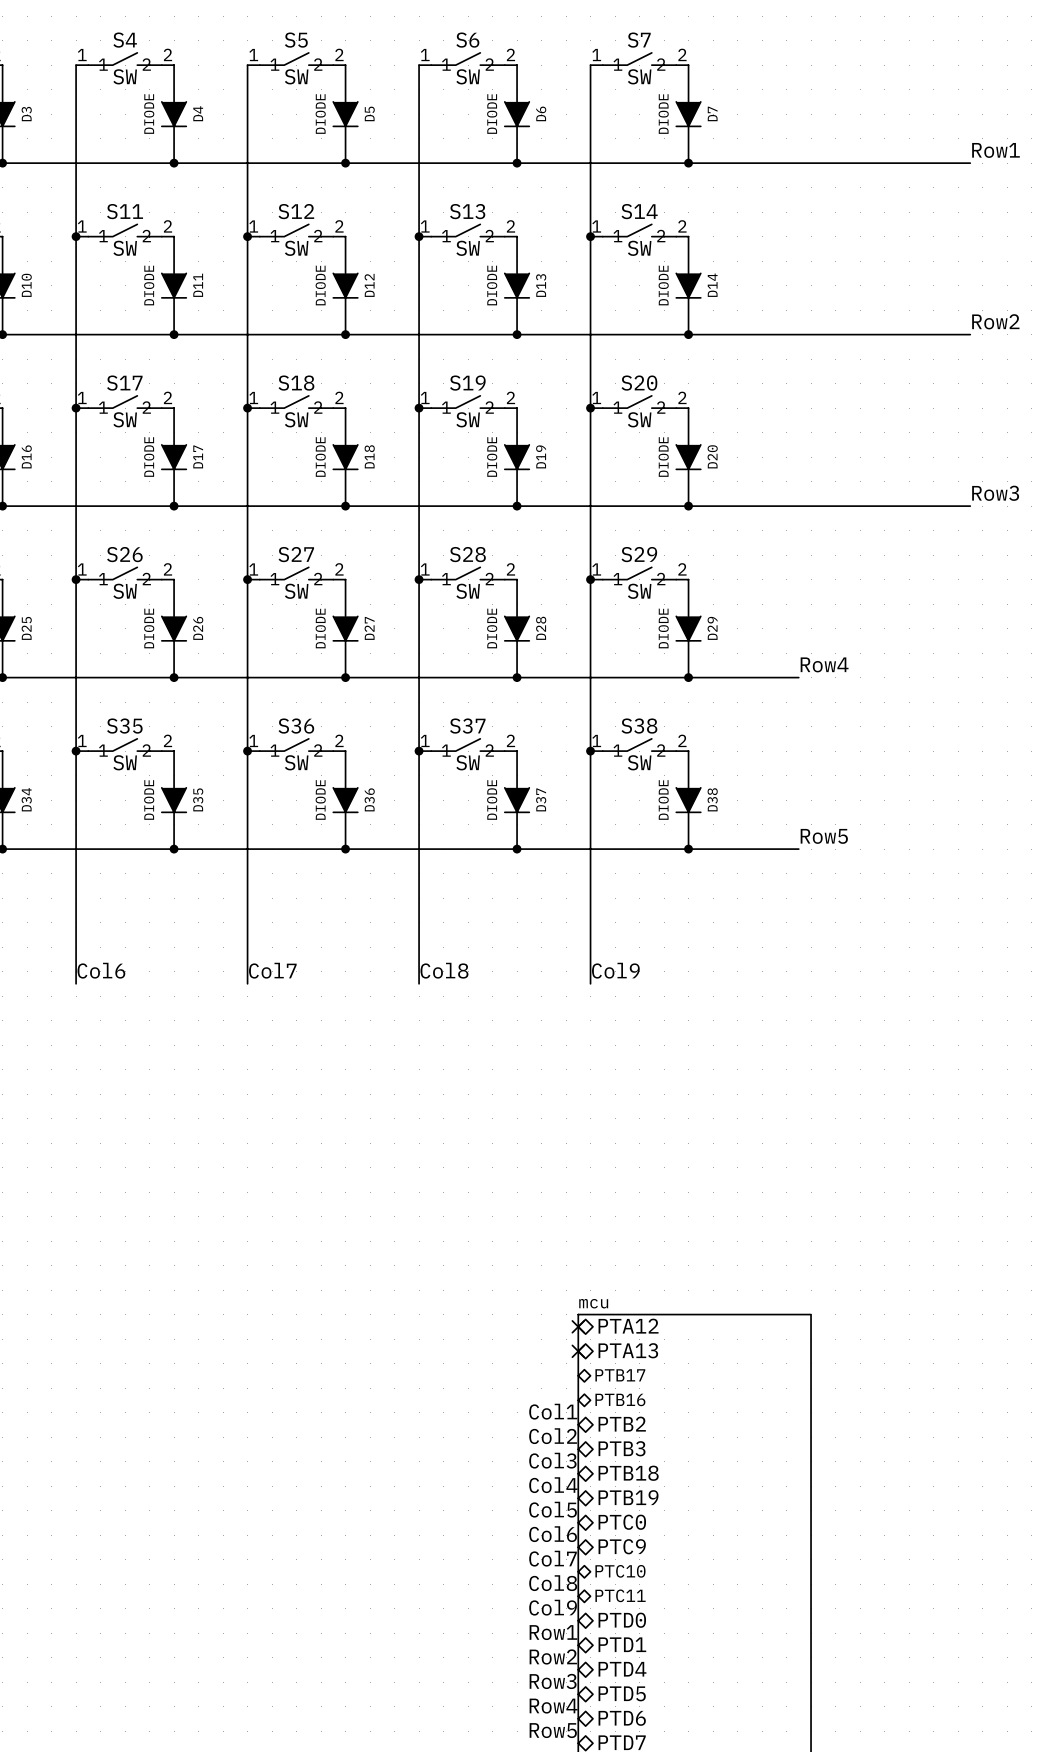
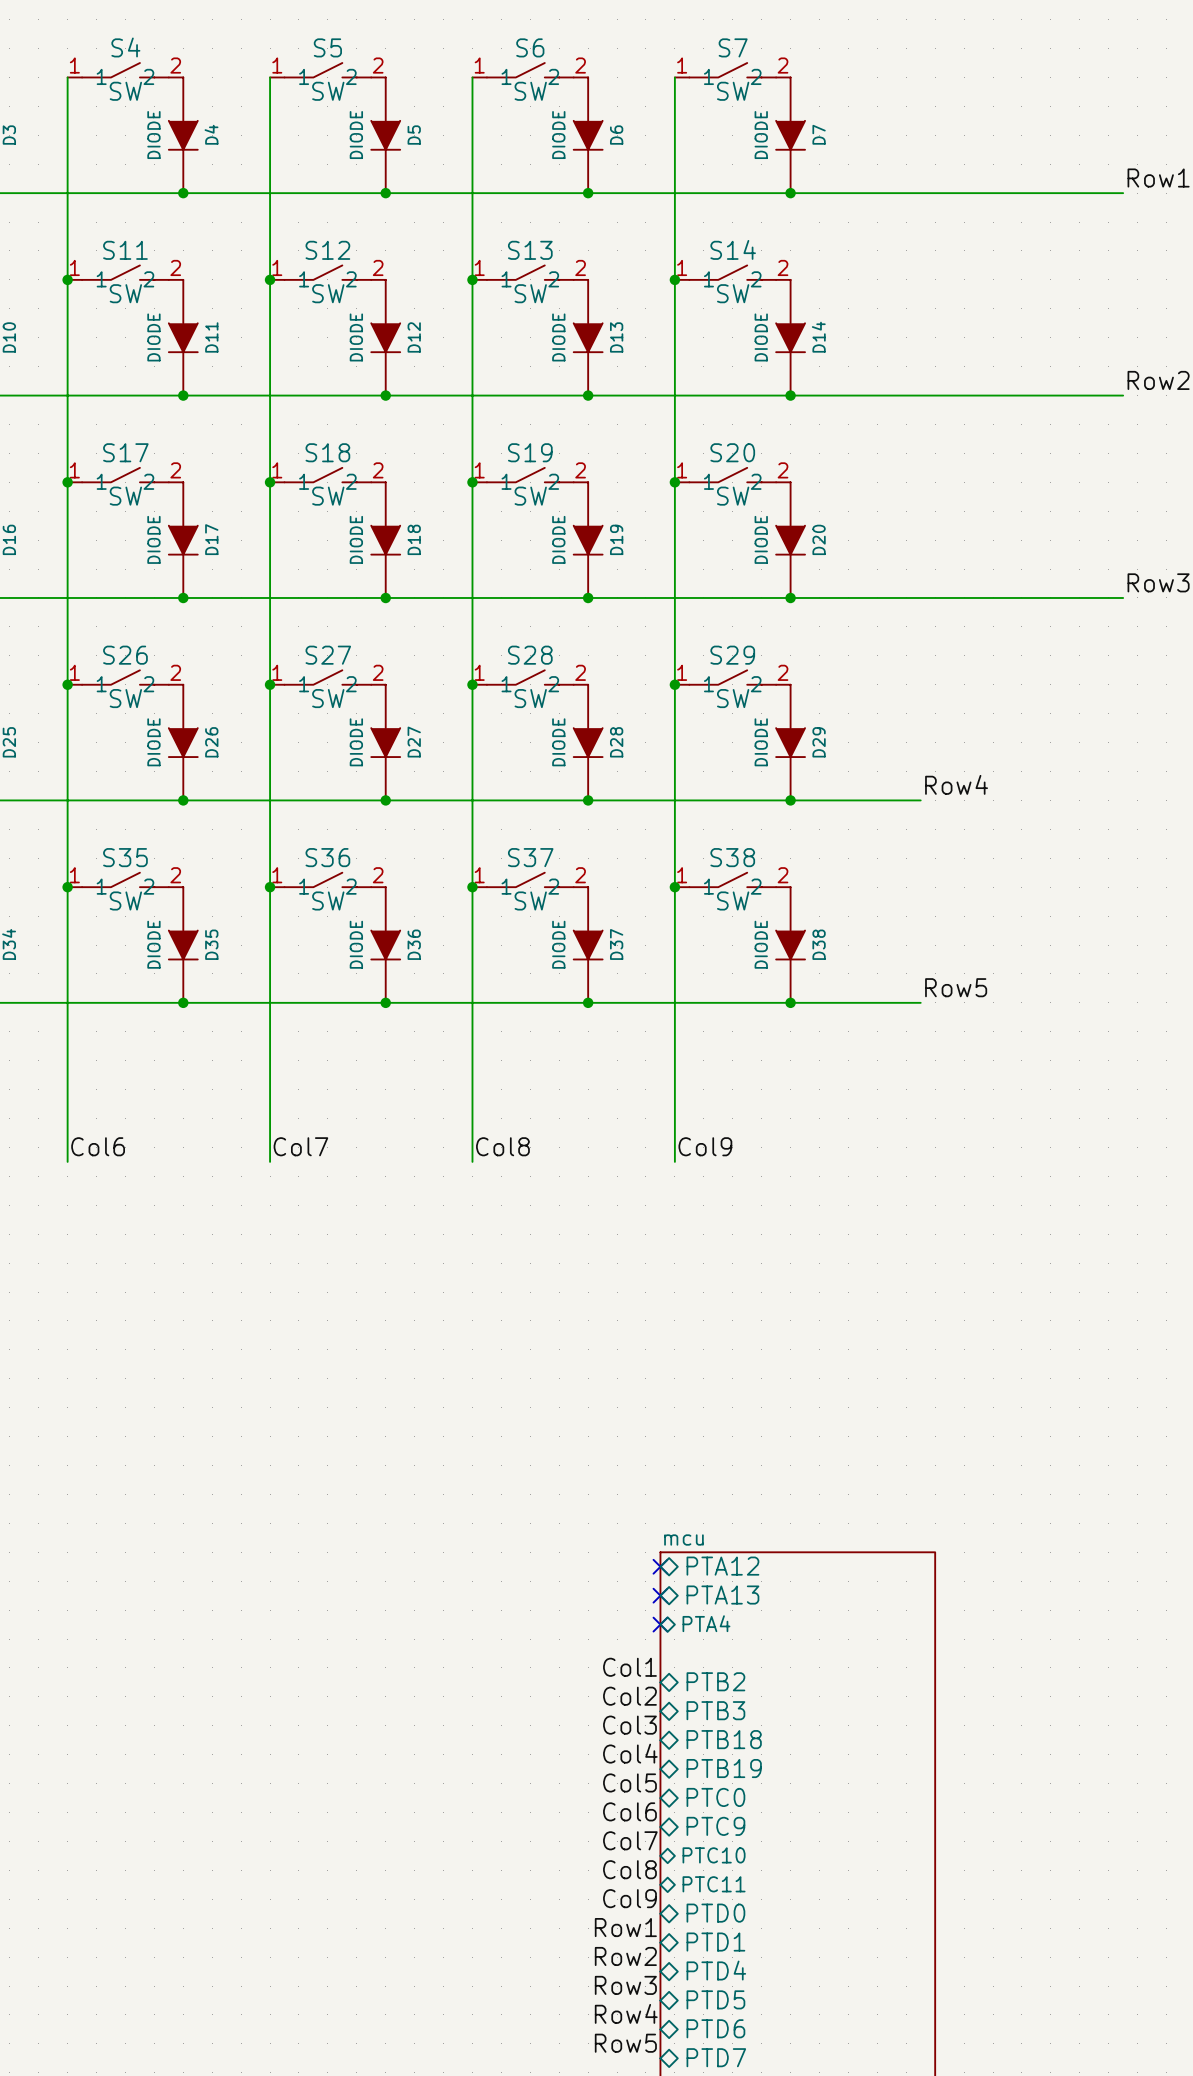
no-connect mark: none -> (660, 1624)
sheet pin: PTB17 (620, 1375) -> PTA4 (706, 1623)
sheet pin: PTB16 (620, 1399) -> none

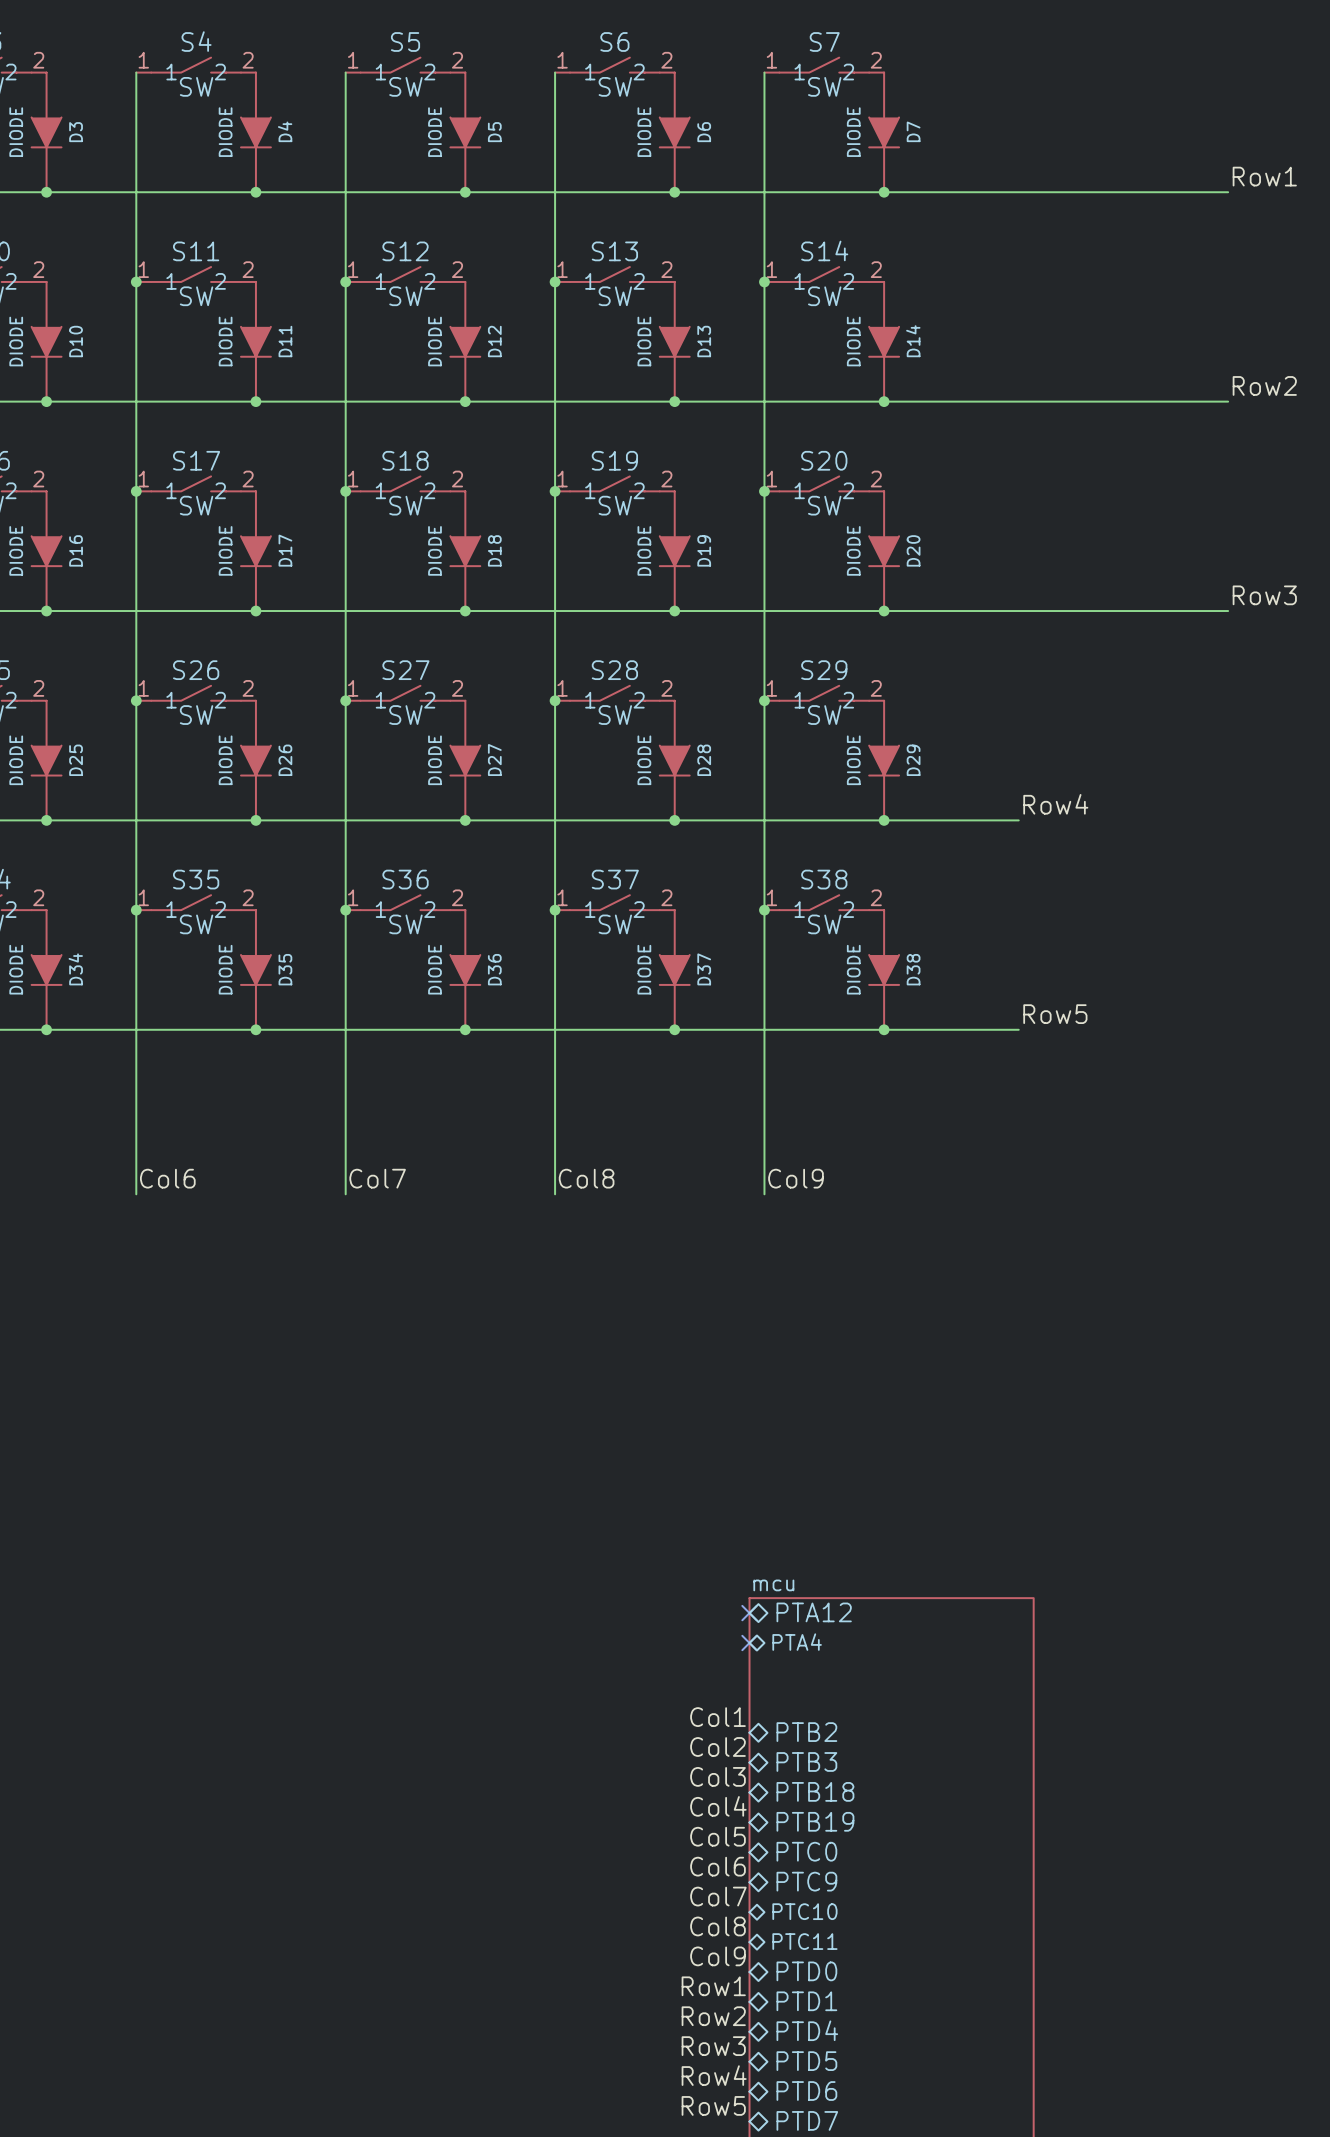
sheet pin: PTA13 (722, 1595) -> none
sheet pin position: PTA4 (706, 1623) -> PTA4 (797, 1642)
no-connect mark: (660, 1624) -> none

